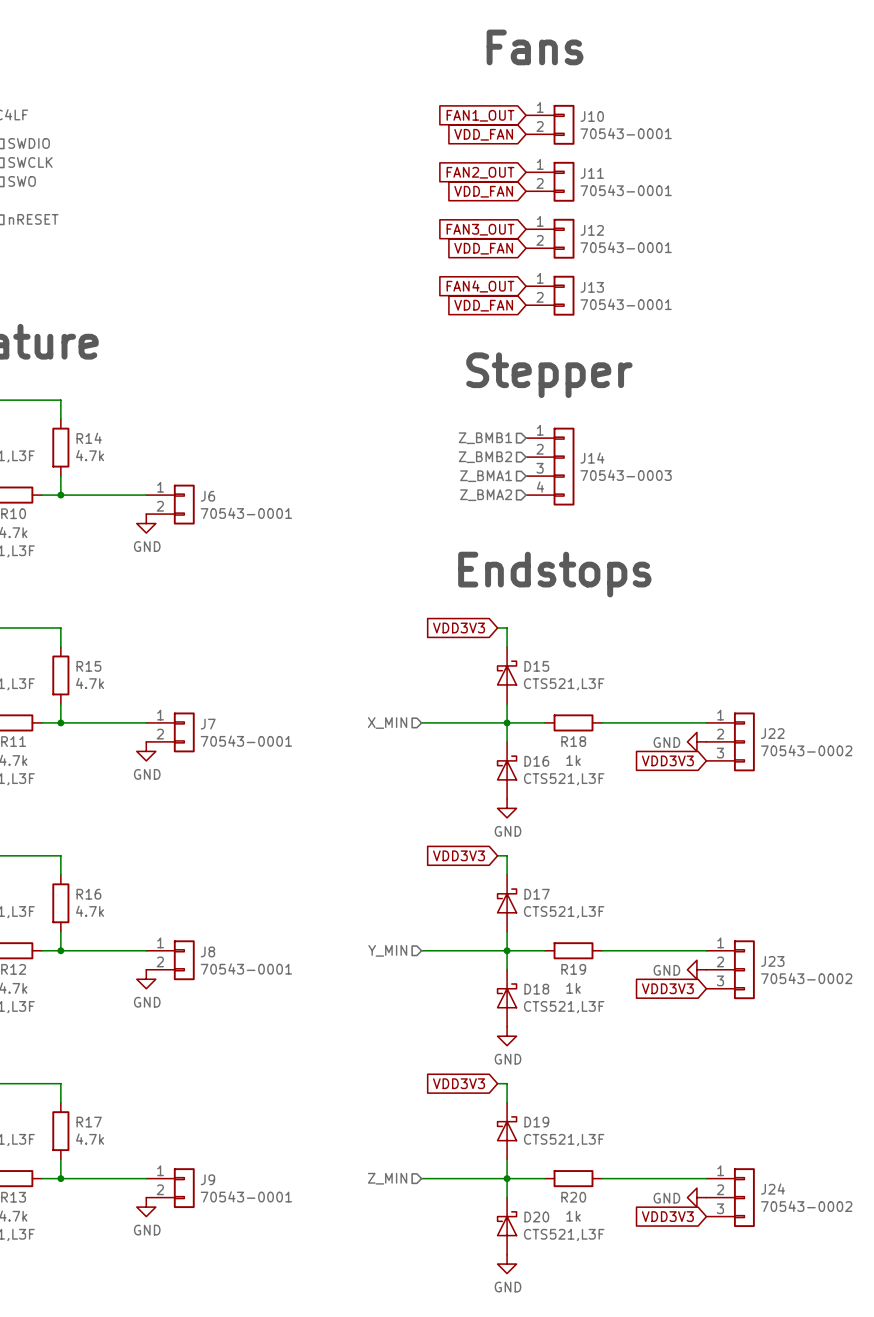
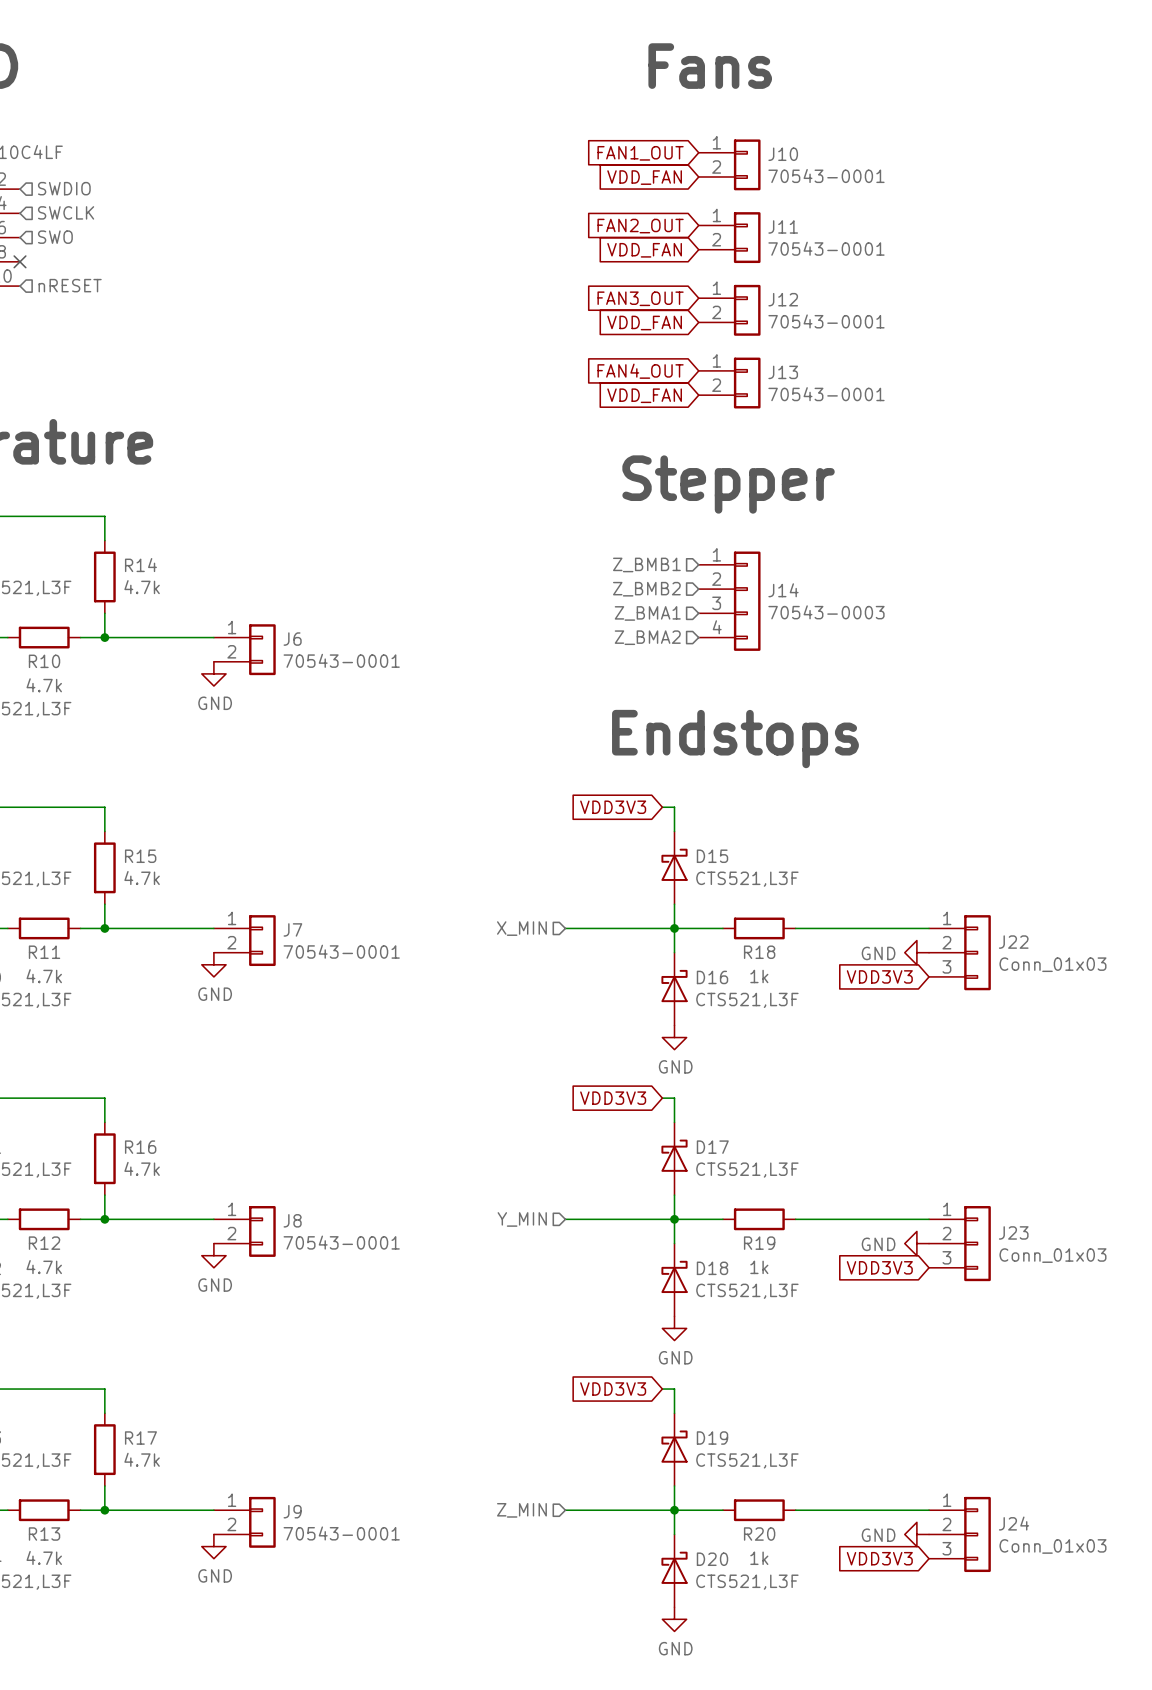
J22 value: 70543-0002 (806, 750) -> Conn_01x03 (1052, 964)
J23 value: 70543-0002 (806, 978) -> Conn_01x03 (1052, 1255)
J24 value: 70543-0002 (806, 1206) -> Conn_01x03 (1052, 1546)

